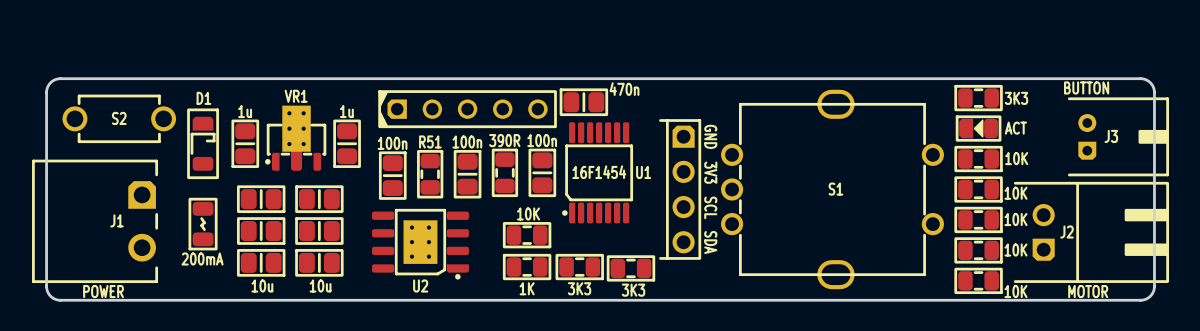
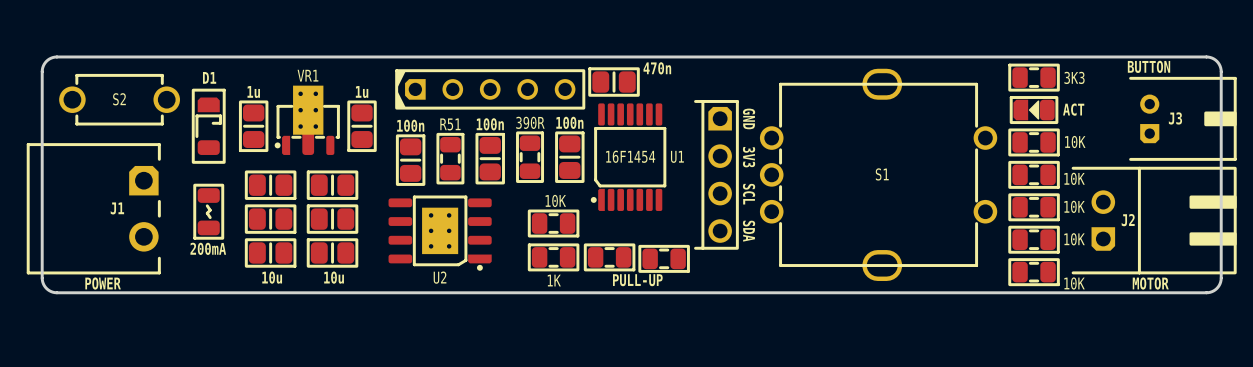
part value: 3K3 (579, 288) -> none
text: none -> PULL-UP (637, 280)
part value: 3K3 (633, 290) -> none

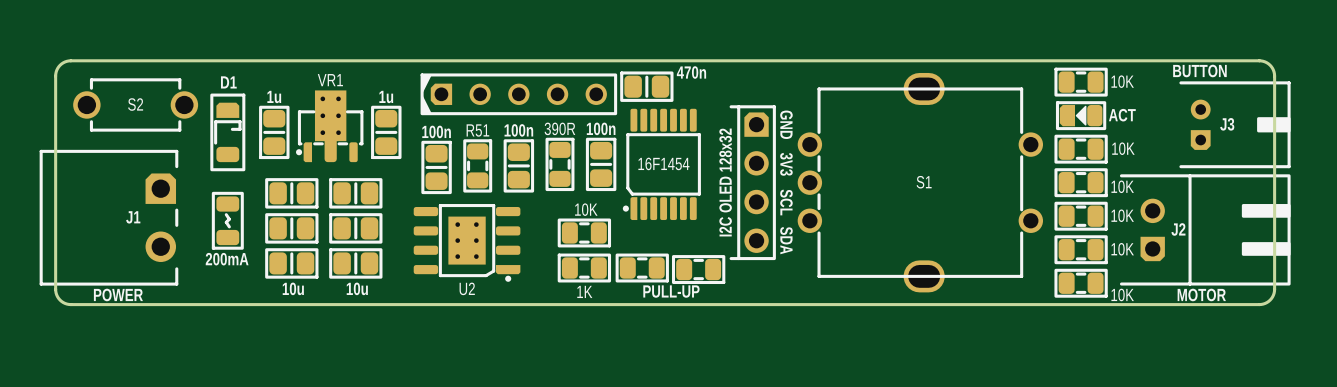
part value: 3K3 (1074, 77) -> 10K (1122, 81)
U1 name: U1 (677, 156) -> none
part value: none -> I2C OLED 128x32 (725, 182)

